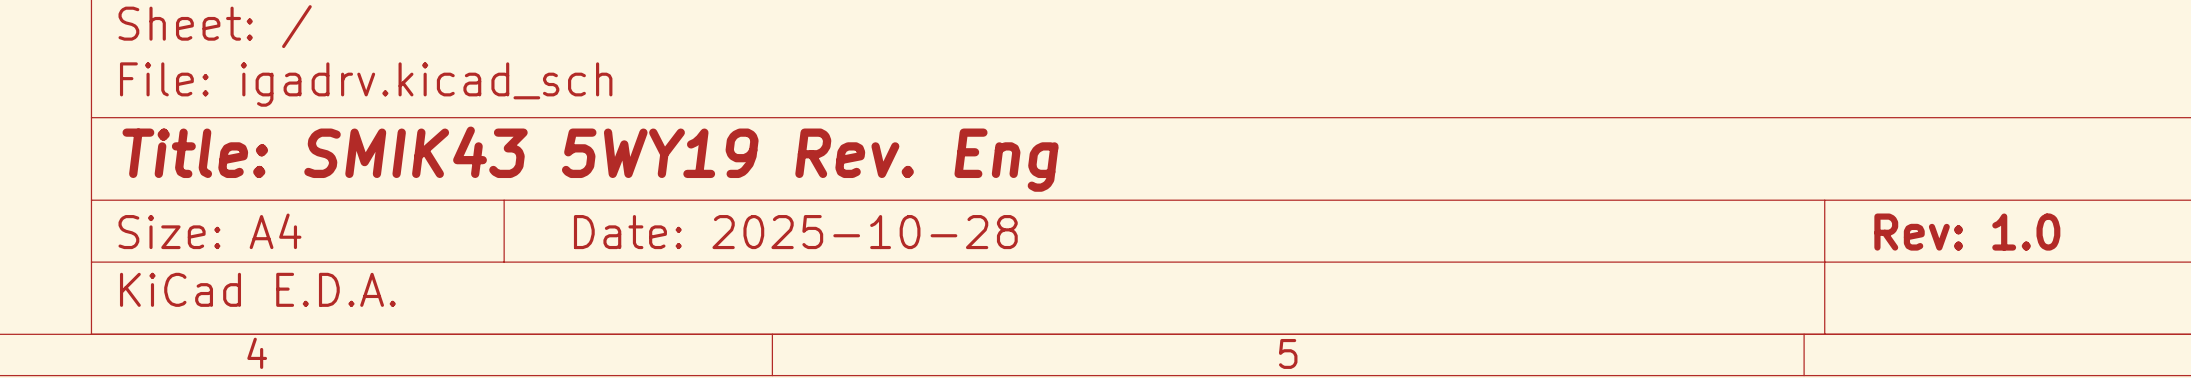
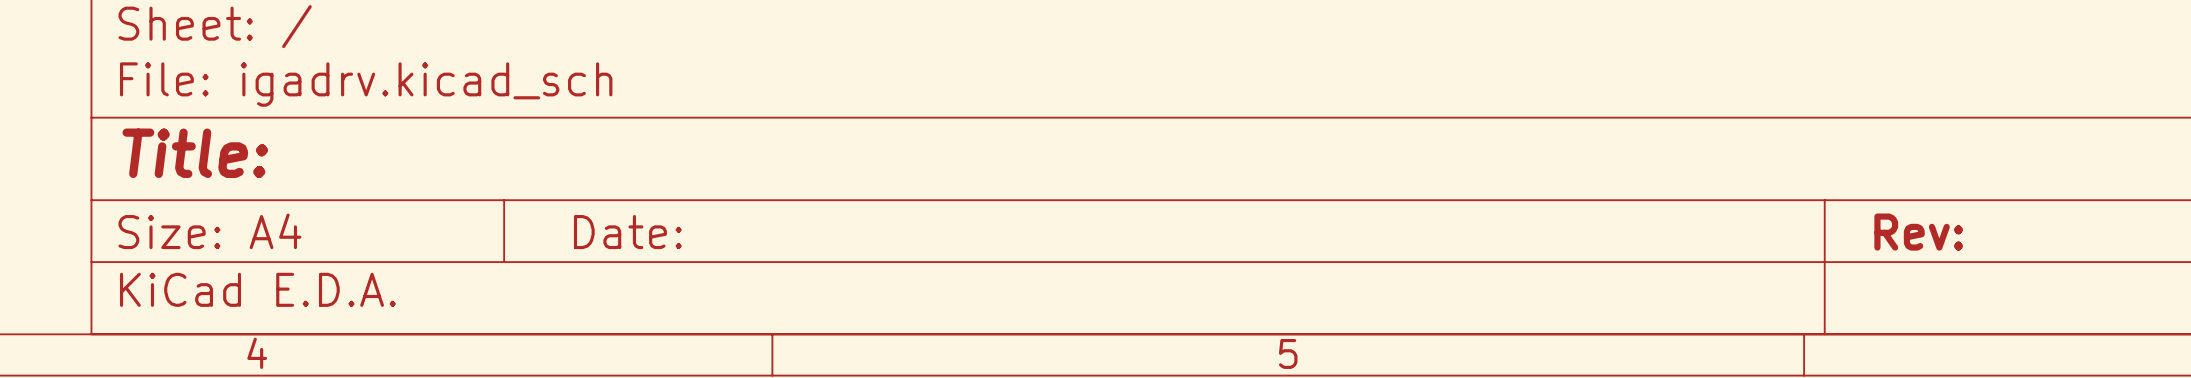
title block: Title: SMIK43 5WY19 Rev. Eng (590, 159) -> Title: (195, 153)
title block: Date: 2025-10-28 (795, 232) -> Date: (627, 232)
title block: Rev: 1.0 (1967, 232) -> Rev: (1918, 232)

